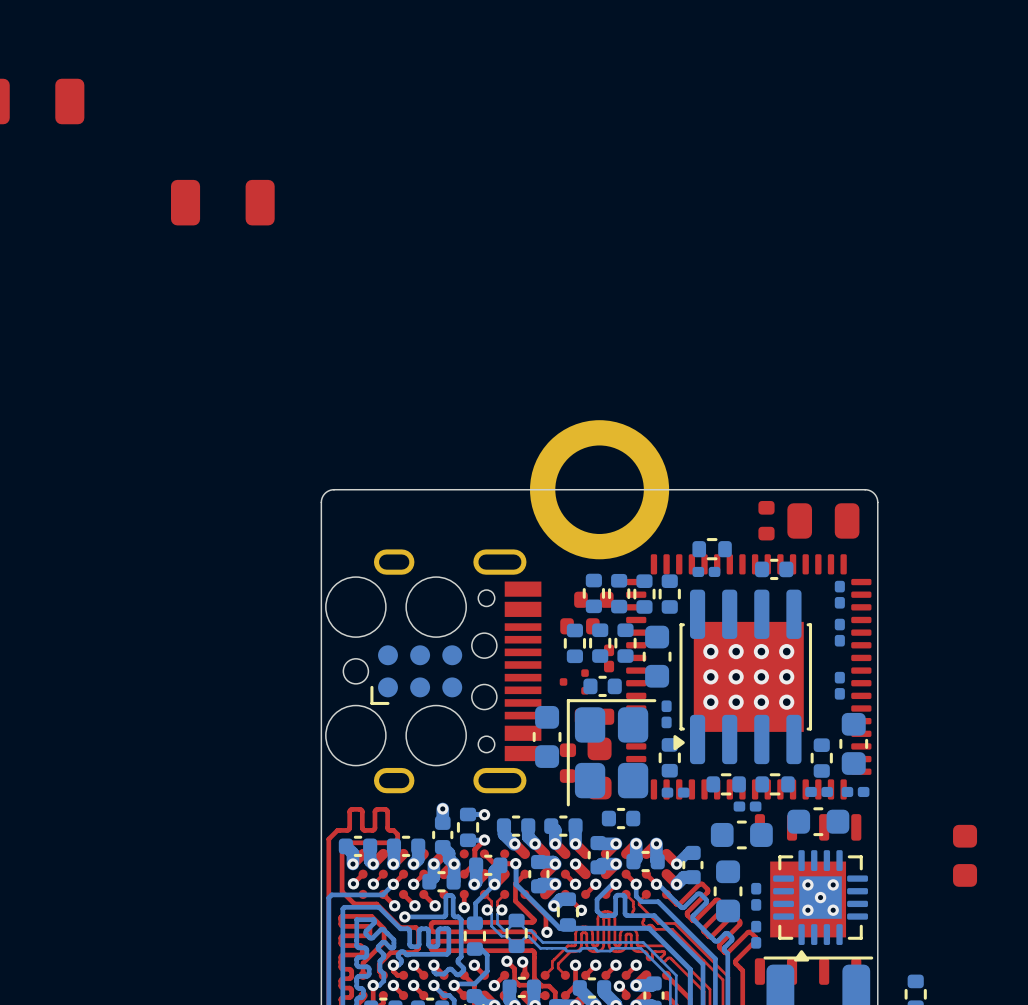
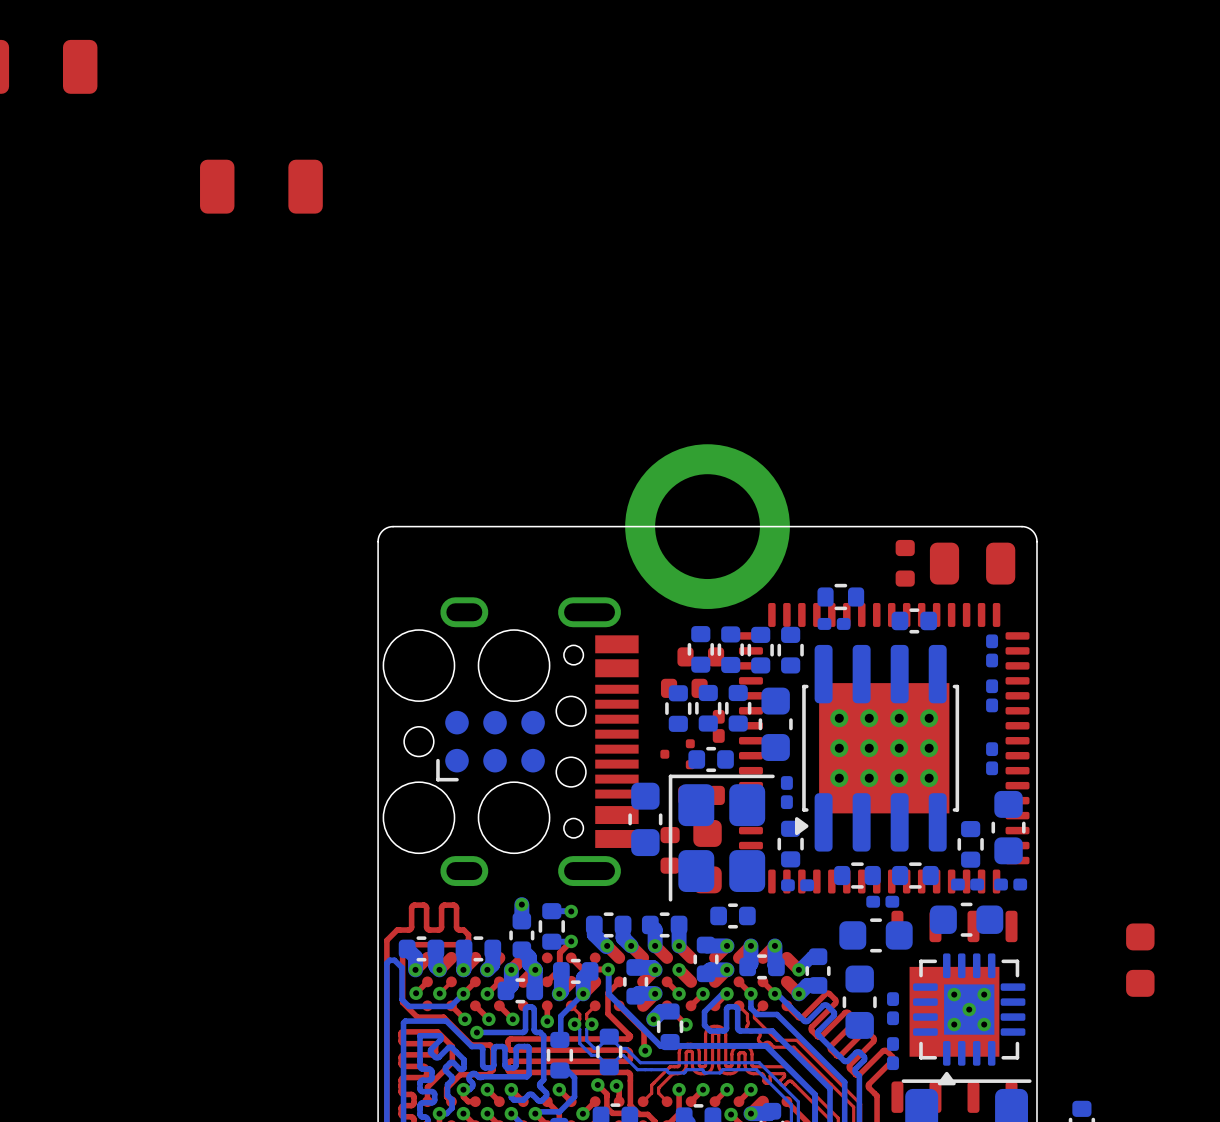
bottom track: (347, 894) (331, 894) (328, 897) -> (408, 1006) (402, 999) (402, 967) (394, 960) (389, 960) (386, 963) (386, 1009)

